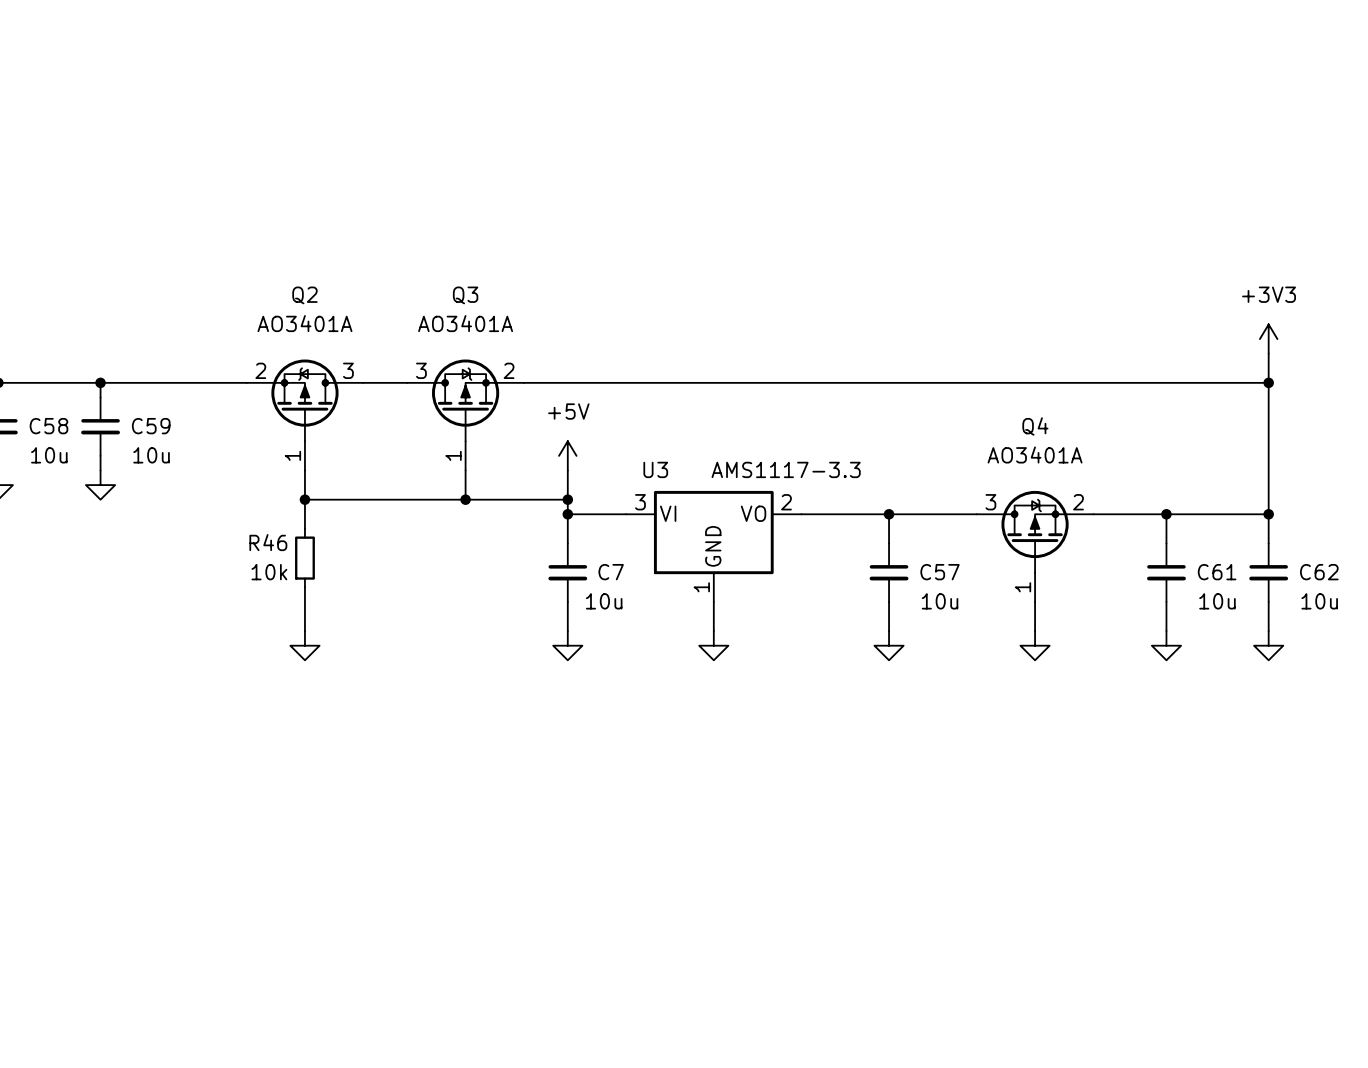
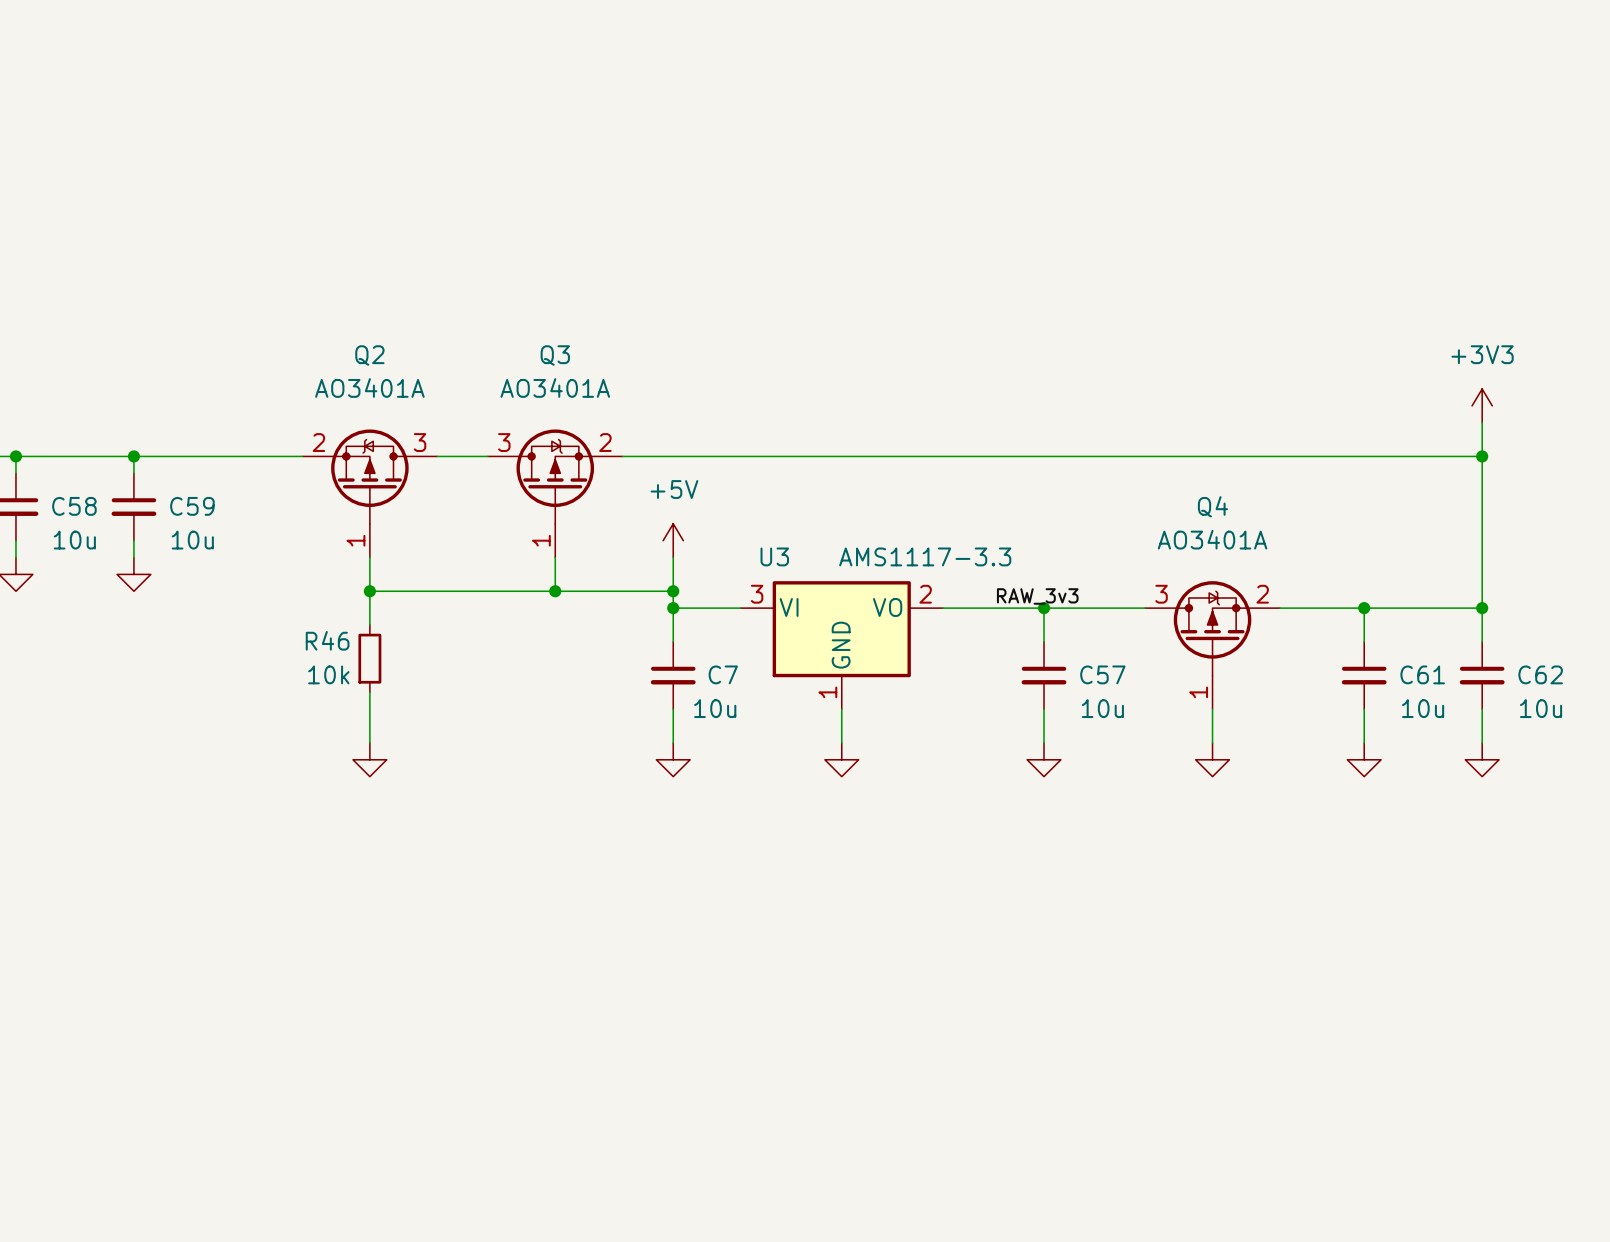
label: none -> RAW_3v3 (1037, 596)

